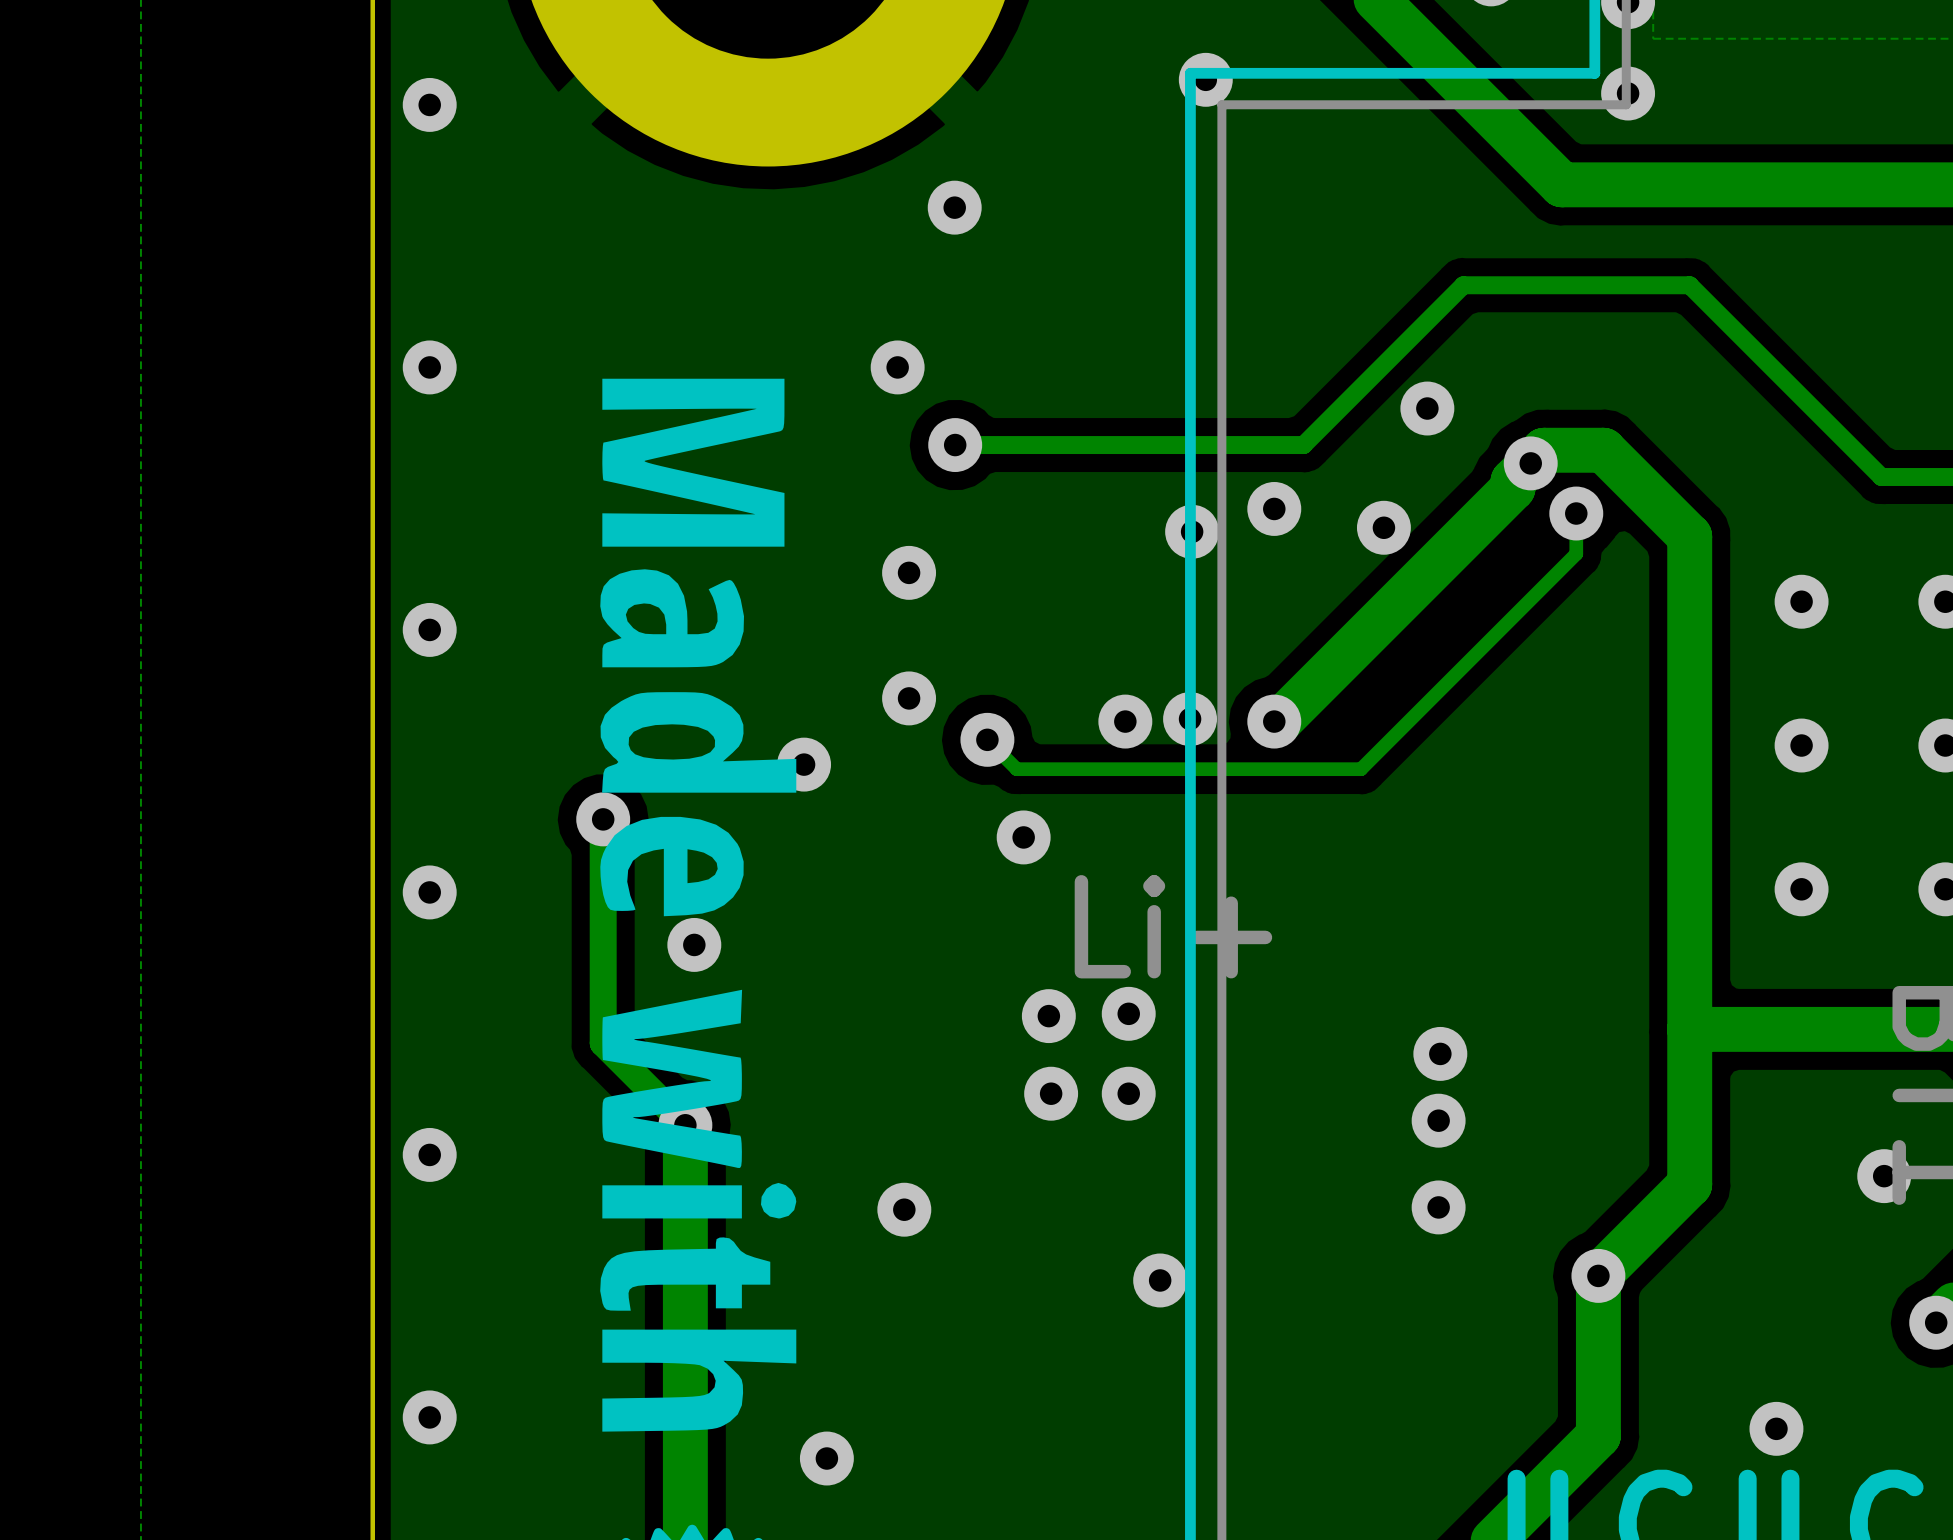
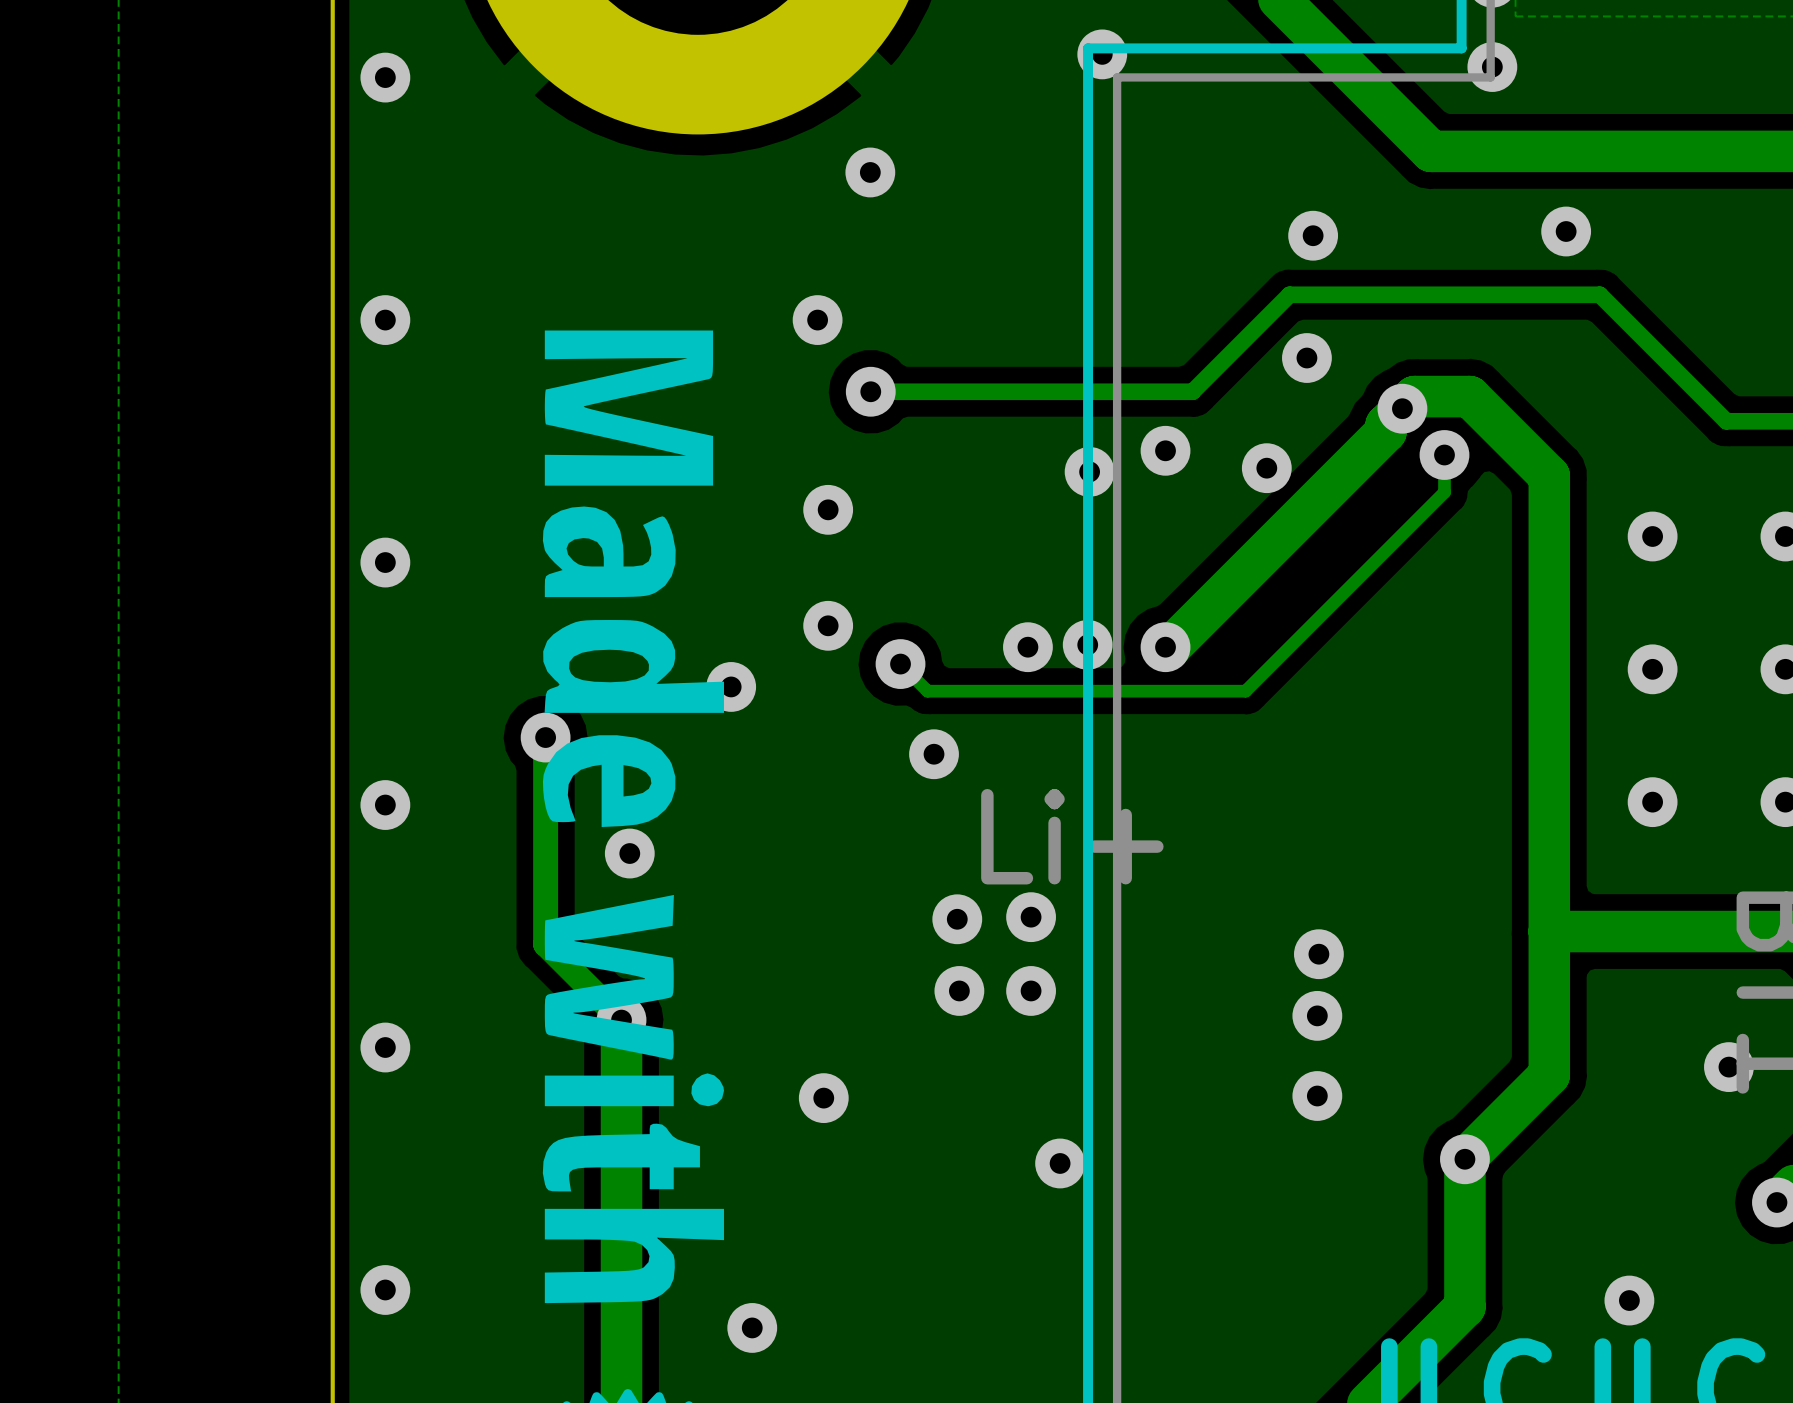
via: none -> (1566, 231)
via: none -> (1313, 235)
track: (1744, 340) (1689, 285) (1463, 285) (1408, 340) -> (1599, 294) (1289, 294)

